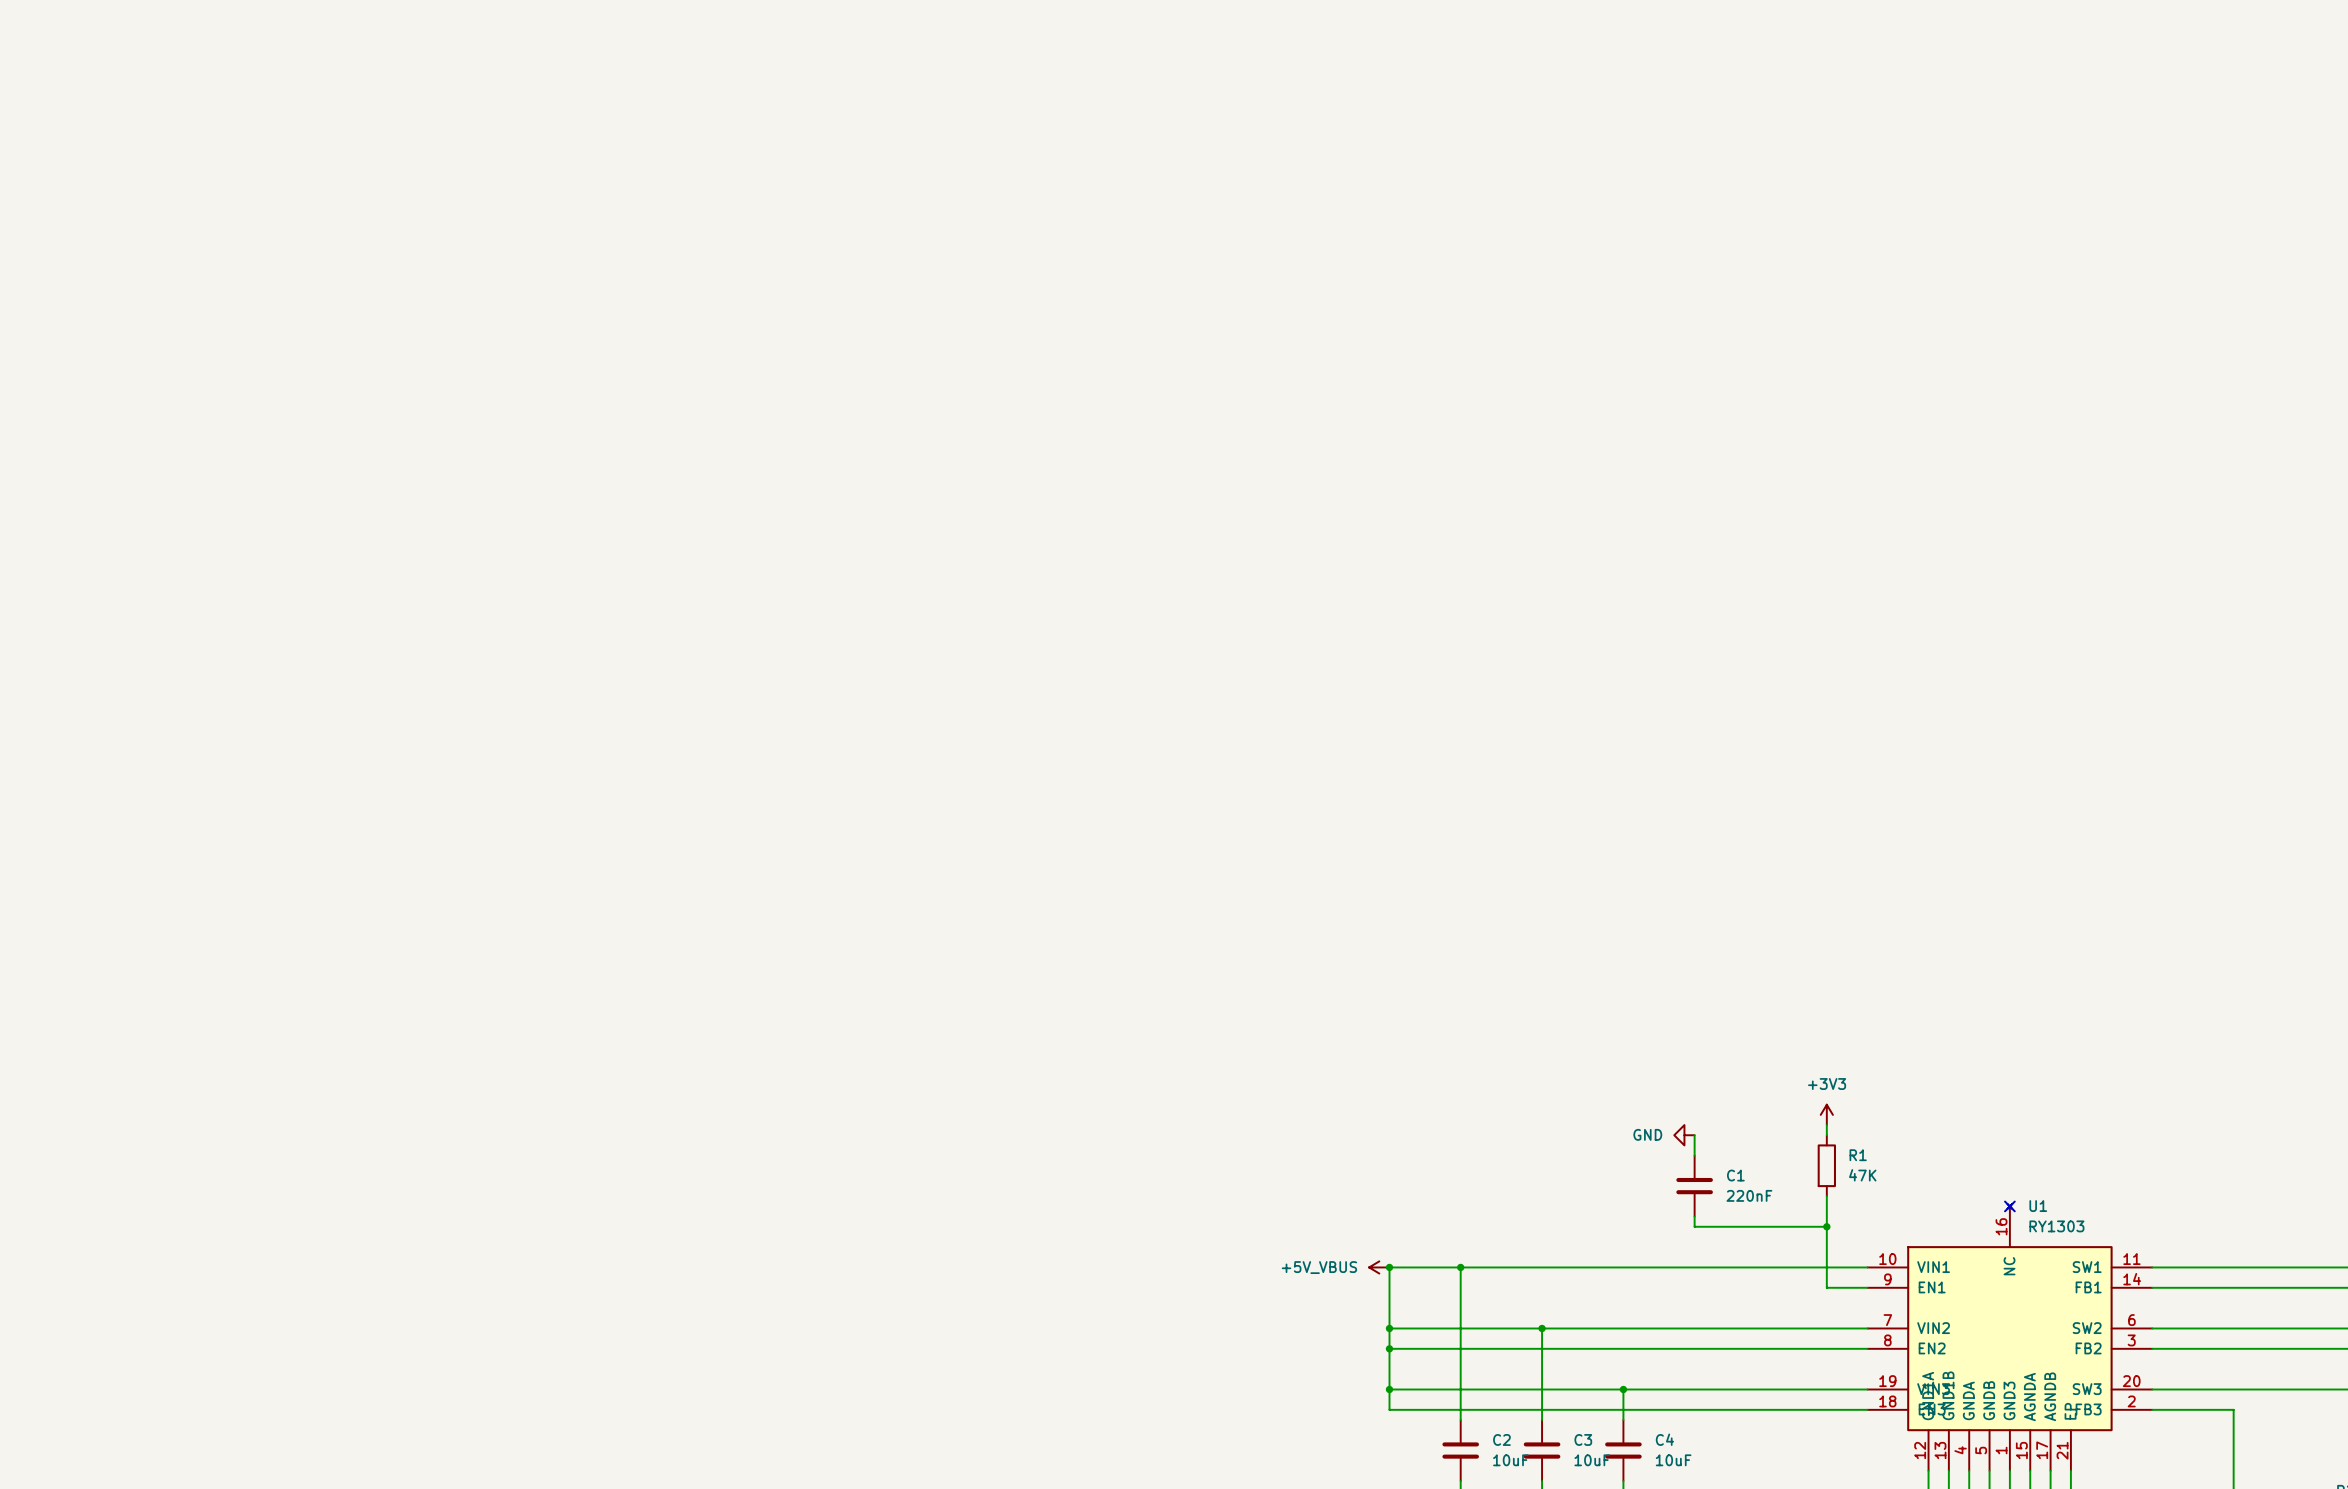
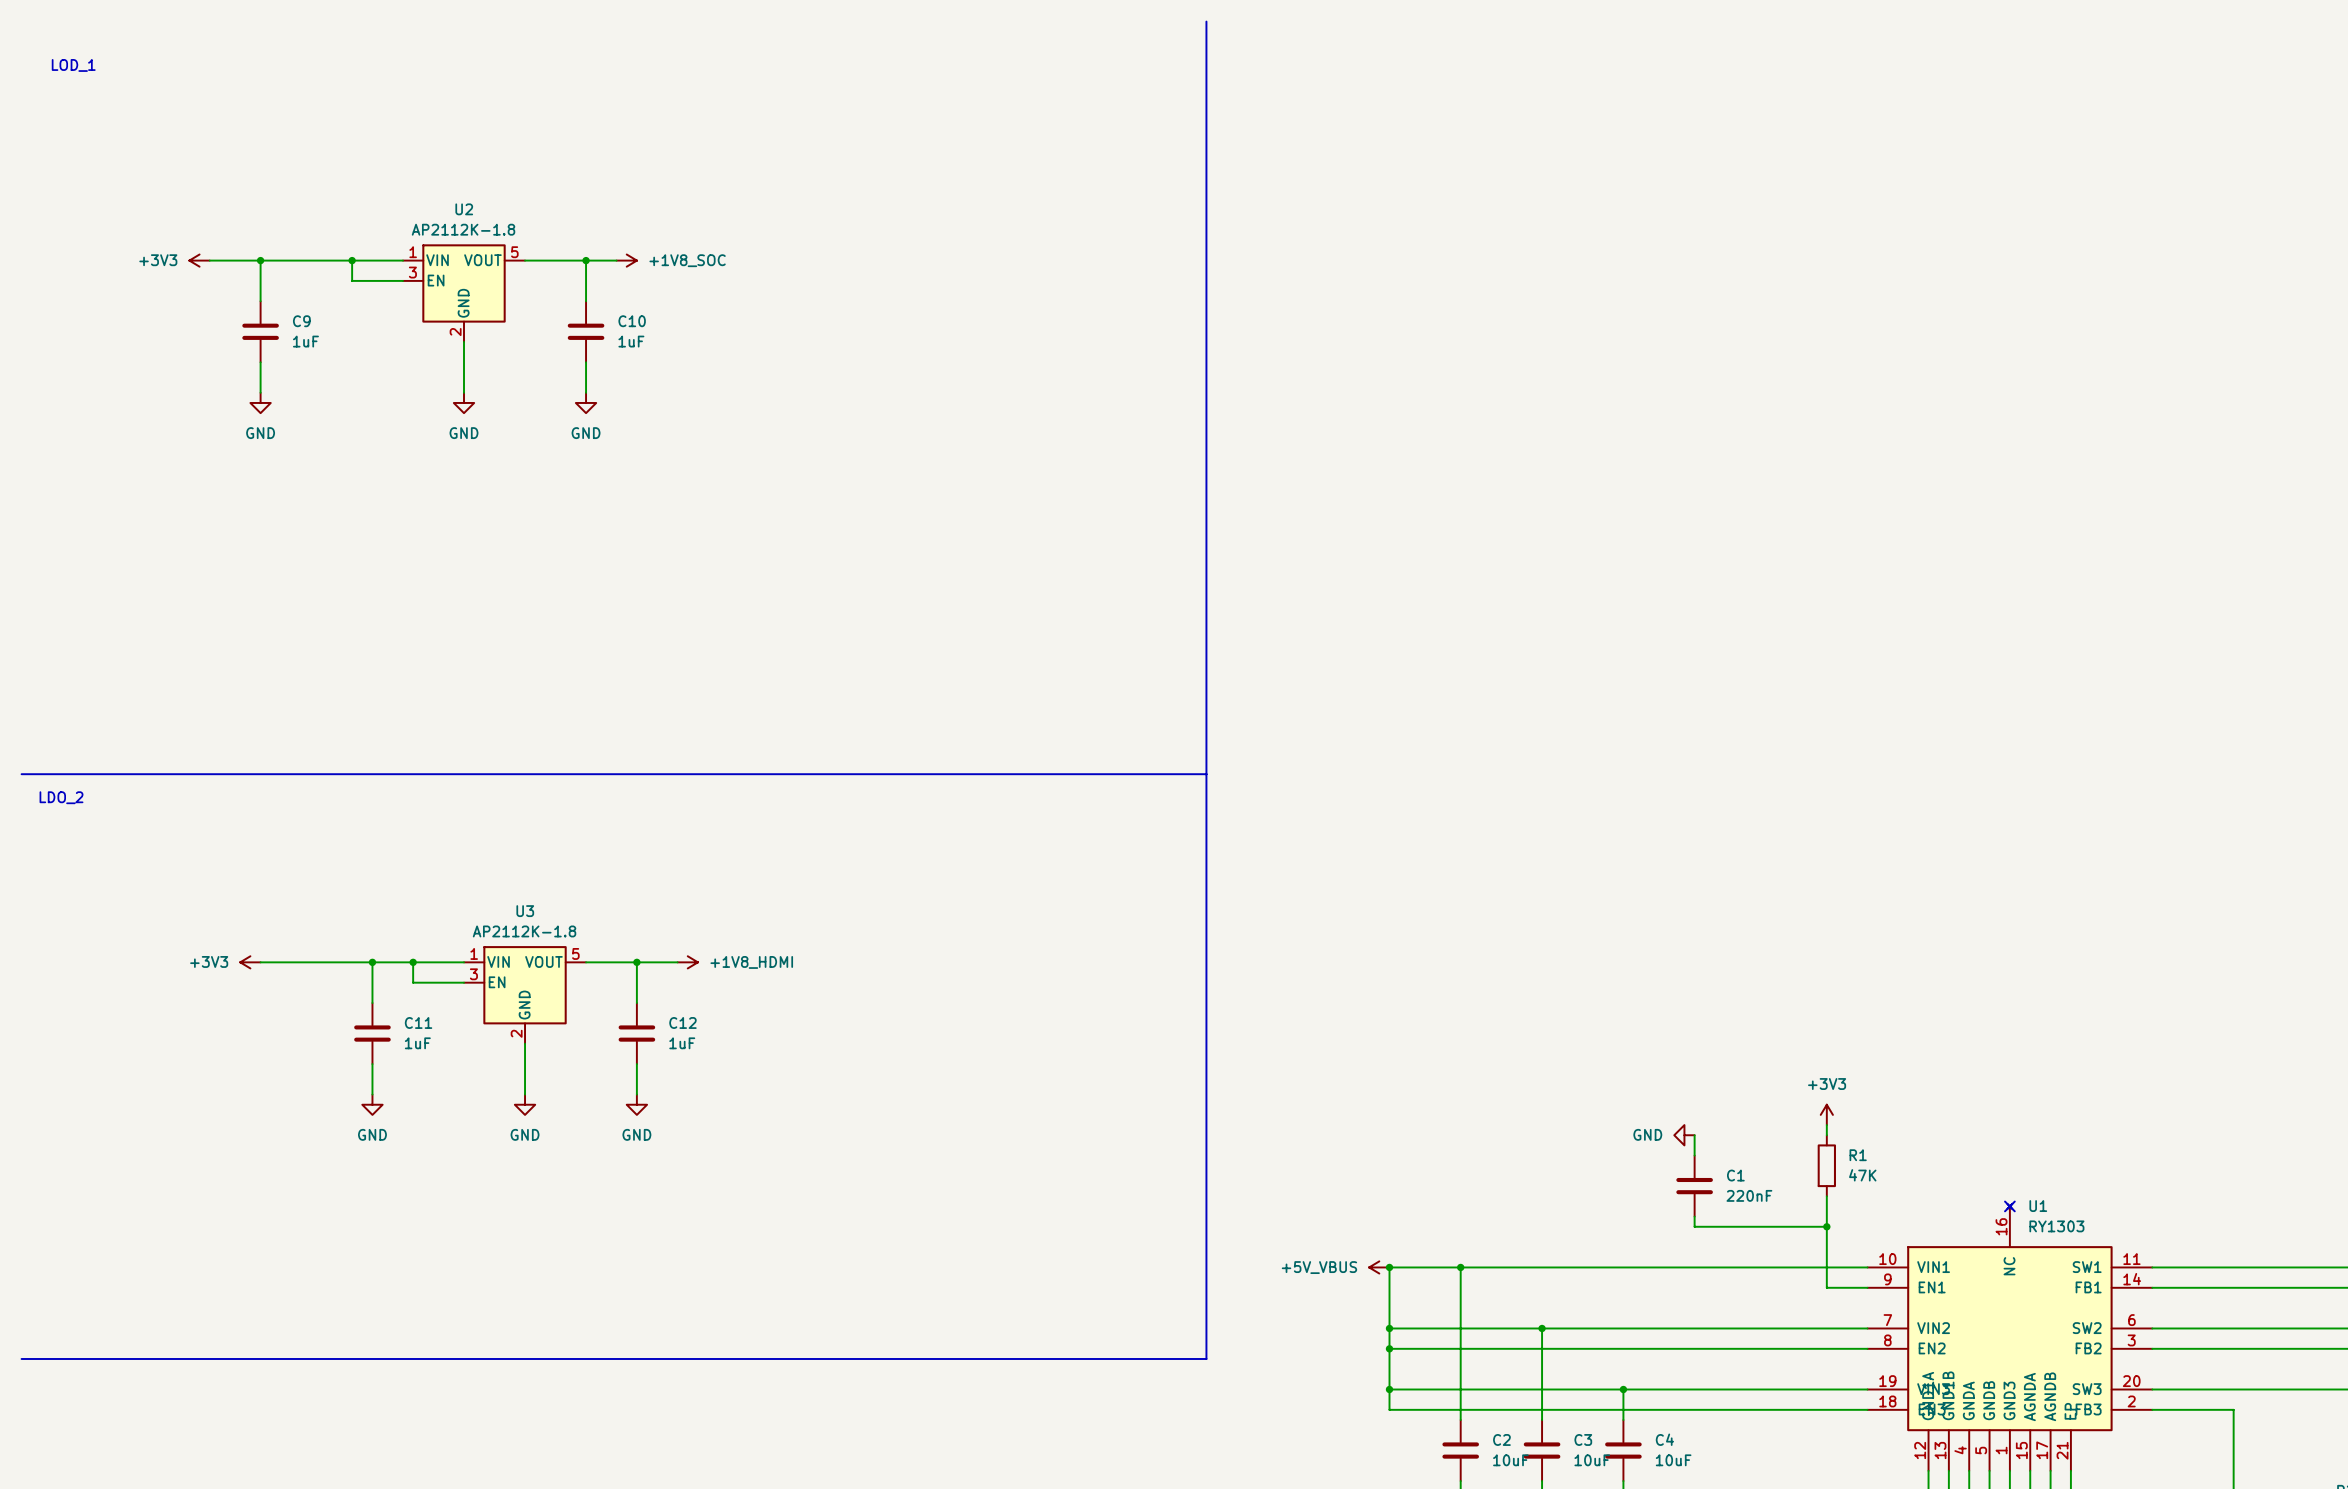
line: none -> (1206, 21) (1206, 1358) (21, 1358)
text: none -> LOD_1 (73, 65)
power symbol: none -> +3V3 (199, 260)
wire: none -> (209, 260) (402, 260)
wire: none -> (260, 260) (260, 301)
junction: none -> (260, 260)
wire: none -> (352, 260) (352, 280) (402, 280)
junction: none -> (352, 260)
wire: none -> (525, 260) (616, 260)
wire: none -> (586, 260) (586, 301)
junction: none -> (586, 260)
power symbol: none -> +1V8_SOC (626, 260)
U2: none -> AP2112K-1.8 (464, 293)
C9: none -> 1uF (260, 331)
C10: none -> 1uF (586, 331)
wire: none -> (464, 341) (464, 392)
wire: none -> (260, 362) (260, 392)
wire: none -> (586, 362) (586, 392)
power symbol: none -> GND (260, 402)
power symbol: none -> GND (464, 402)
power symbol: none -> GND (586, 402)
line: none -> (21, 774) (1206, 774)
text: none -> LDO_2 (61, 797)
power symbol: none -> +3V3 (250, 962)
wire: none -> (260, 962) (464, 962)
wire: none -> (372, 962) (372, 1003)
junction: none -> (372, 962)
wire: none -> (413, 962) (413, 982) (464, 982)
junction: none -> (413, 962)
wire: none -> (586, 962) (677, 962)
wire: none -> (636, 962) (636, 1003)
junction: none -> (636, 962)
power symbol: none -> +1V8_HDMI (687, 962)
U3: none -> AP2112K-1.8 (525, 994)
C11: none -> 1uF (372, 1033)
C12: none -> 1uF (636, 1033)
wire: none -> (525, 1043) (525, 1094)
wire: none -> (372, 1064) (372, 1094)
wire: none -> (636, 1064) (636, 1094)
power symbol: none -> GND (372, 1104)
power symbol: none -> GND (525, 1104)
power symbol: none -> GND (636, 1104)

